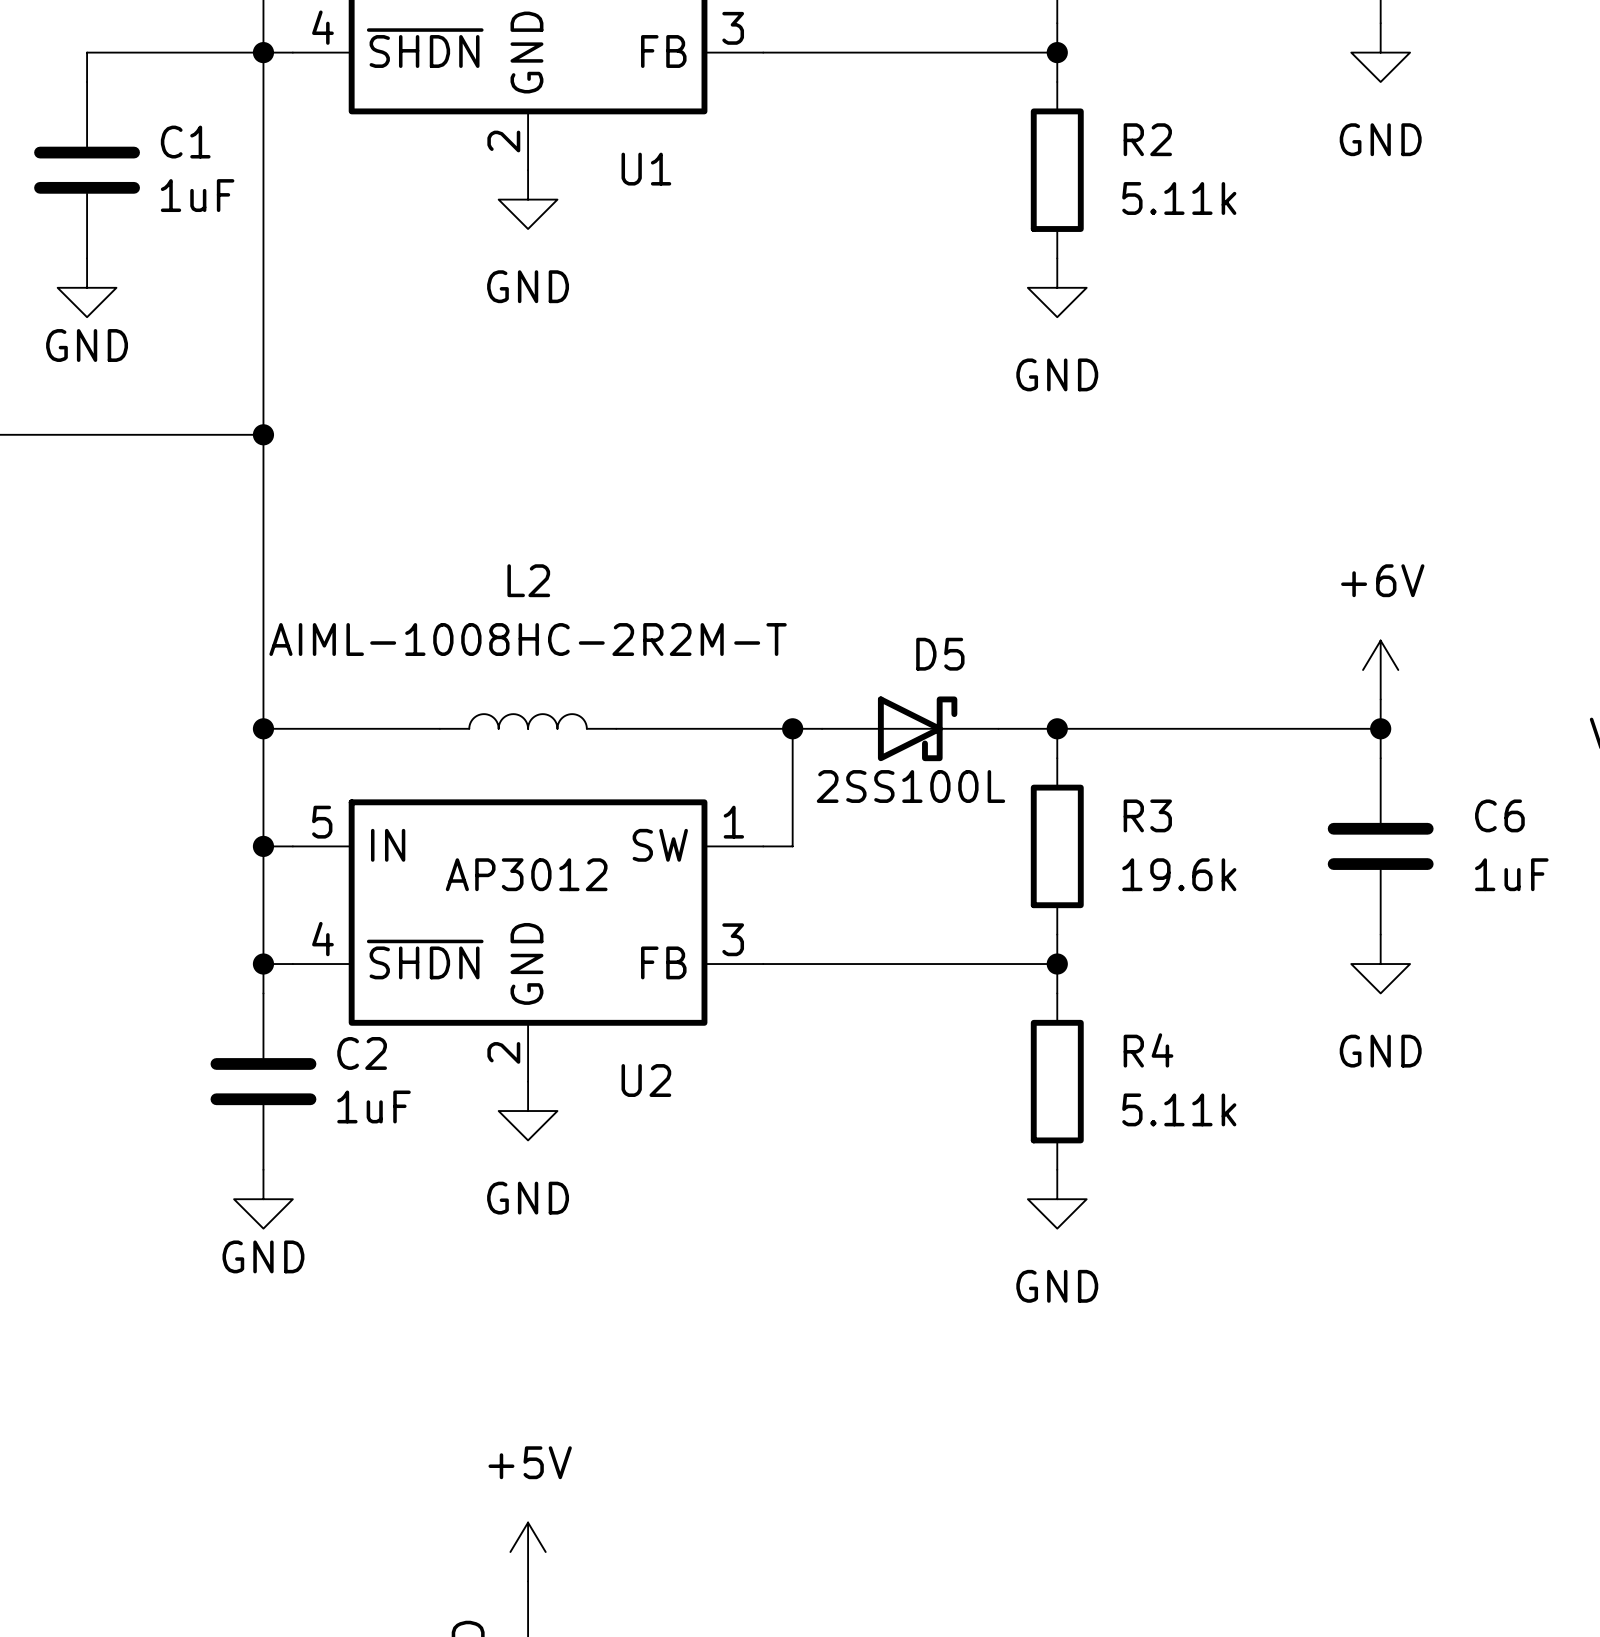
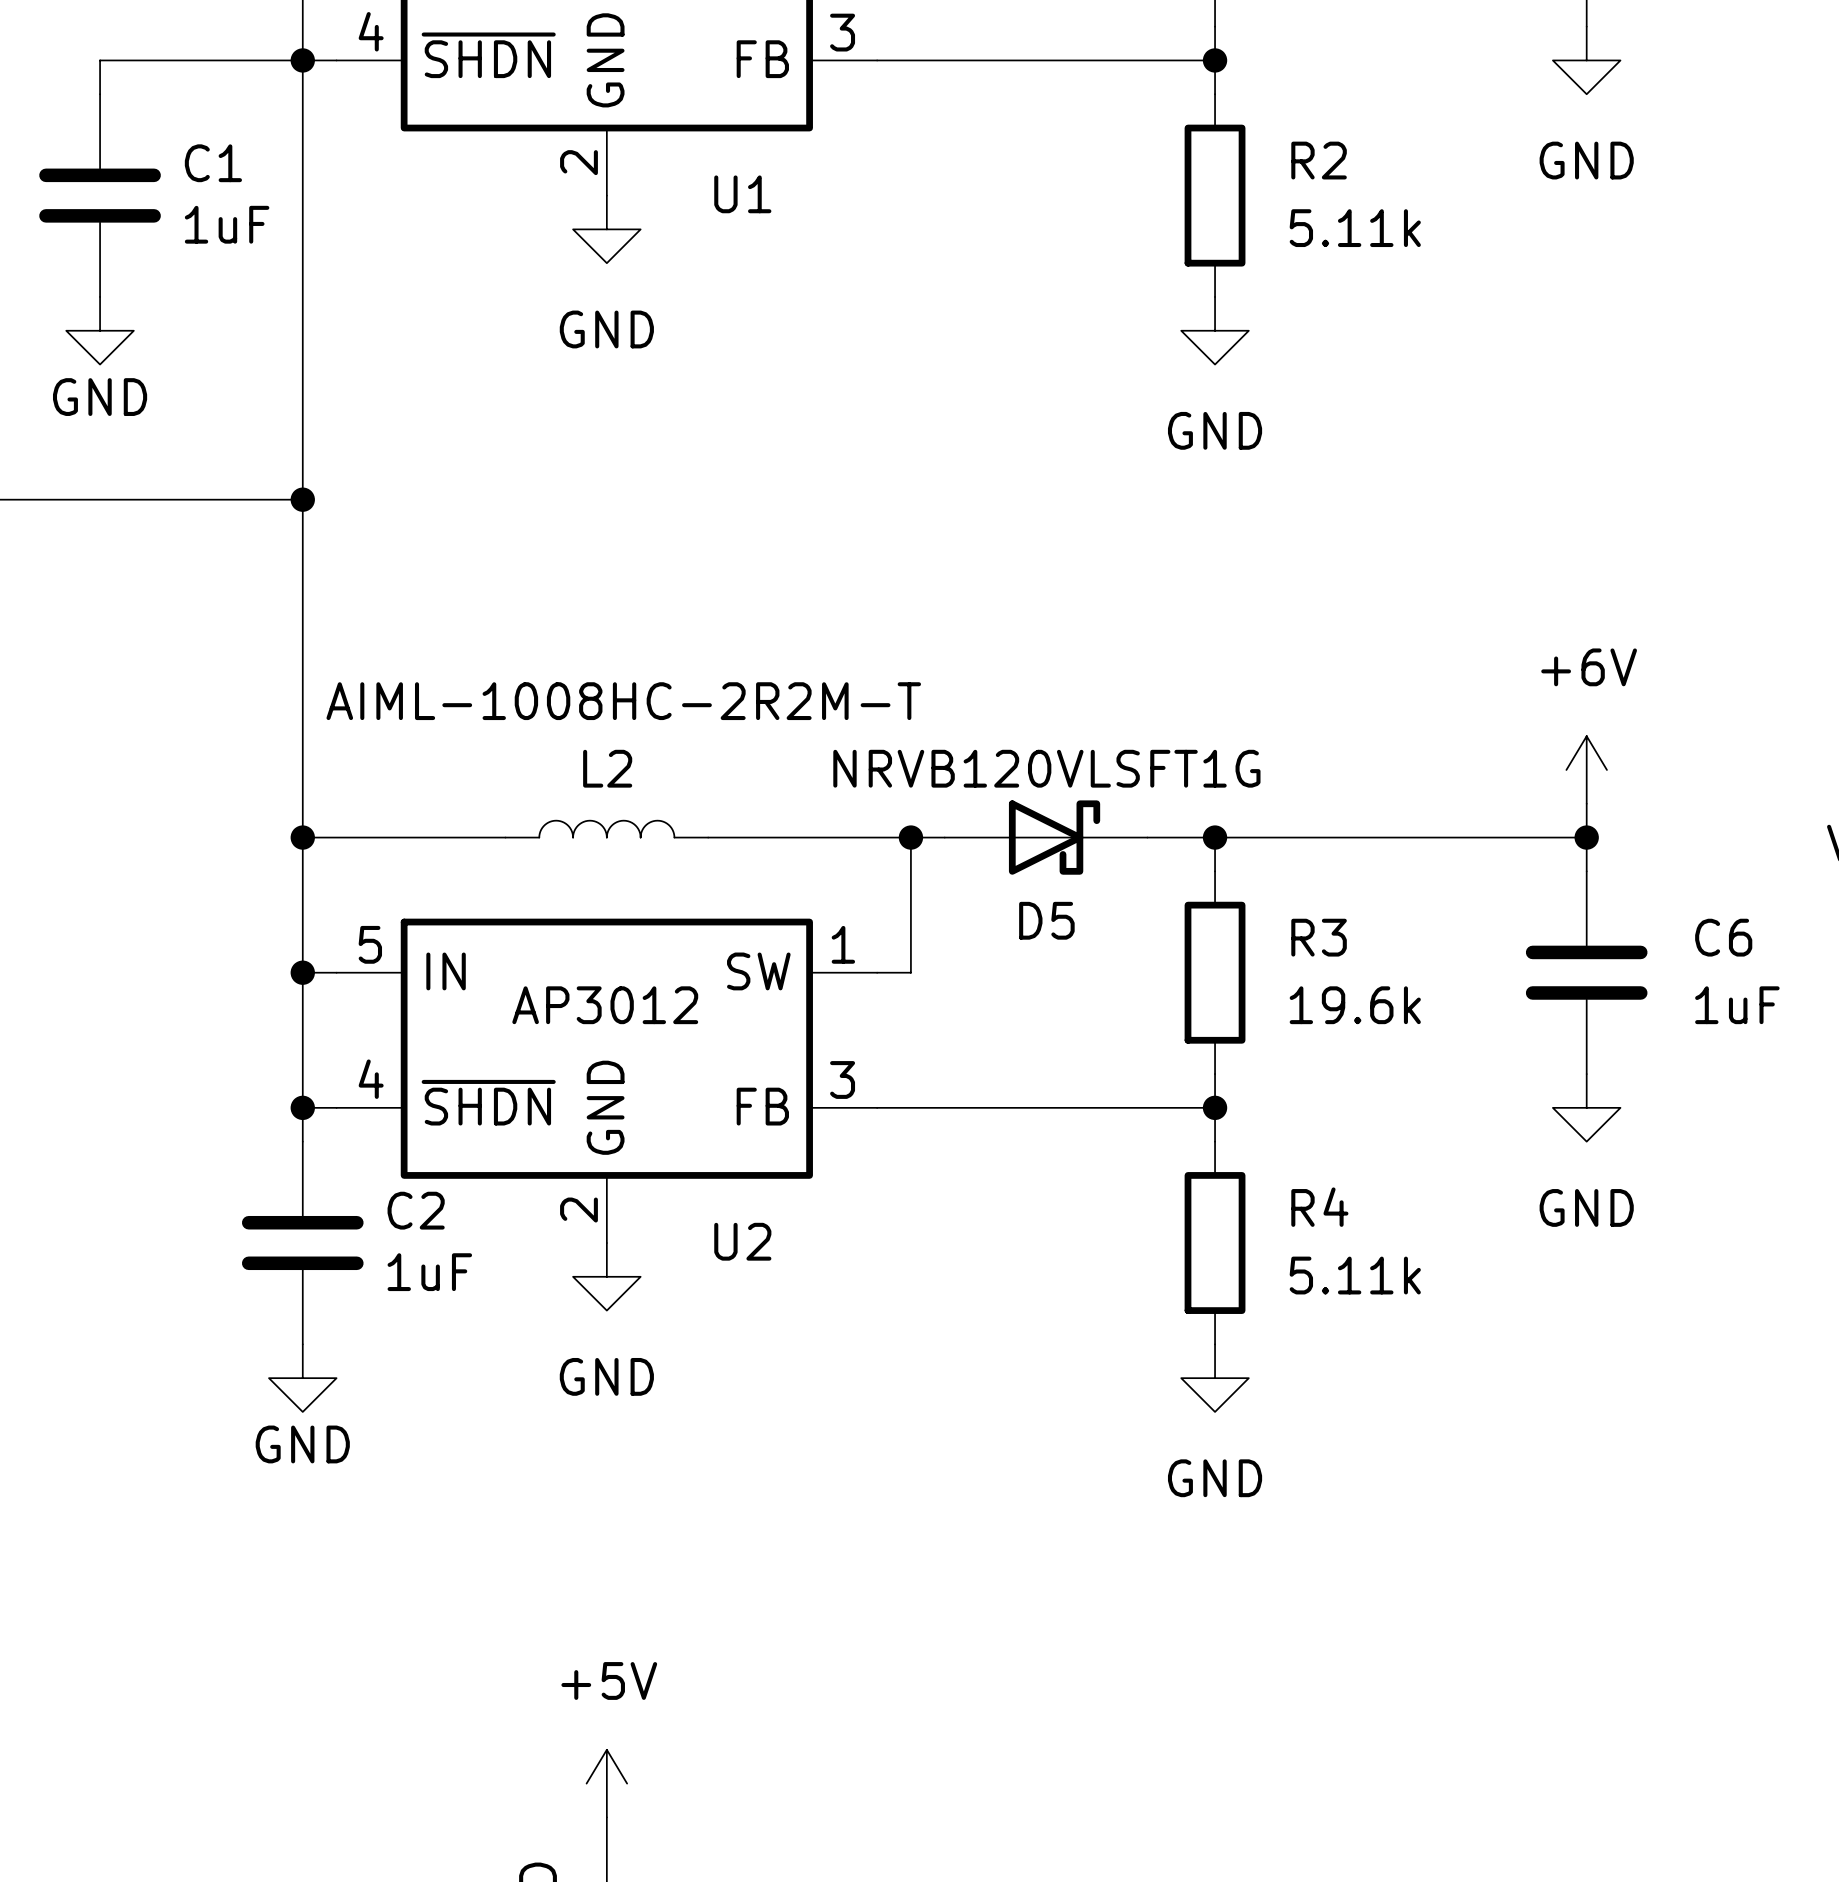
L2 name position: L2 (528, 580) -> L2 (607, 768)
L2 value position: AIML-1008HC-2R2M-T (528, 639) -> AIML-1008HC-2R2M-T (623, 701)
D5 name position: D5 (940, 654) -> D5 (1046, 920)
D5 value: 2SS100L (910, 786) -> NRVB120VLSFT1G (1046, 768)

